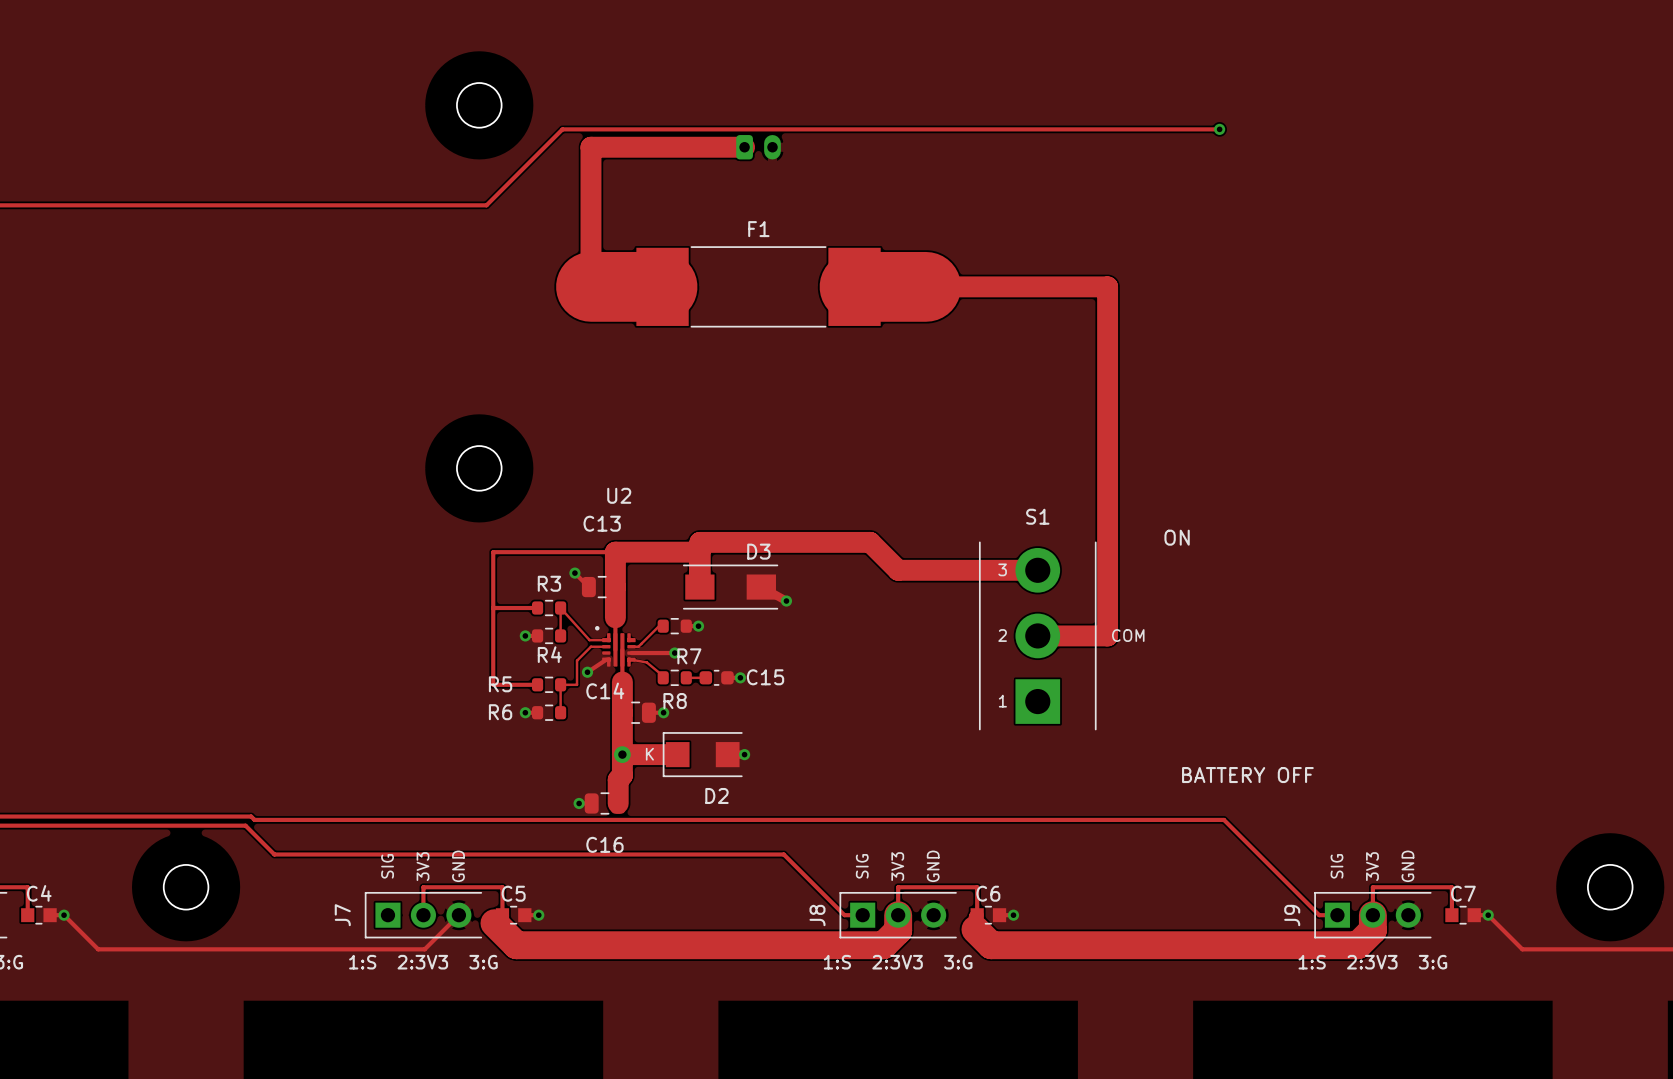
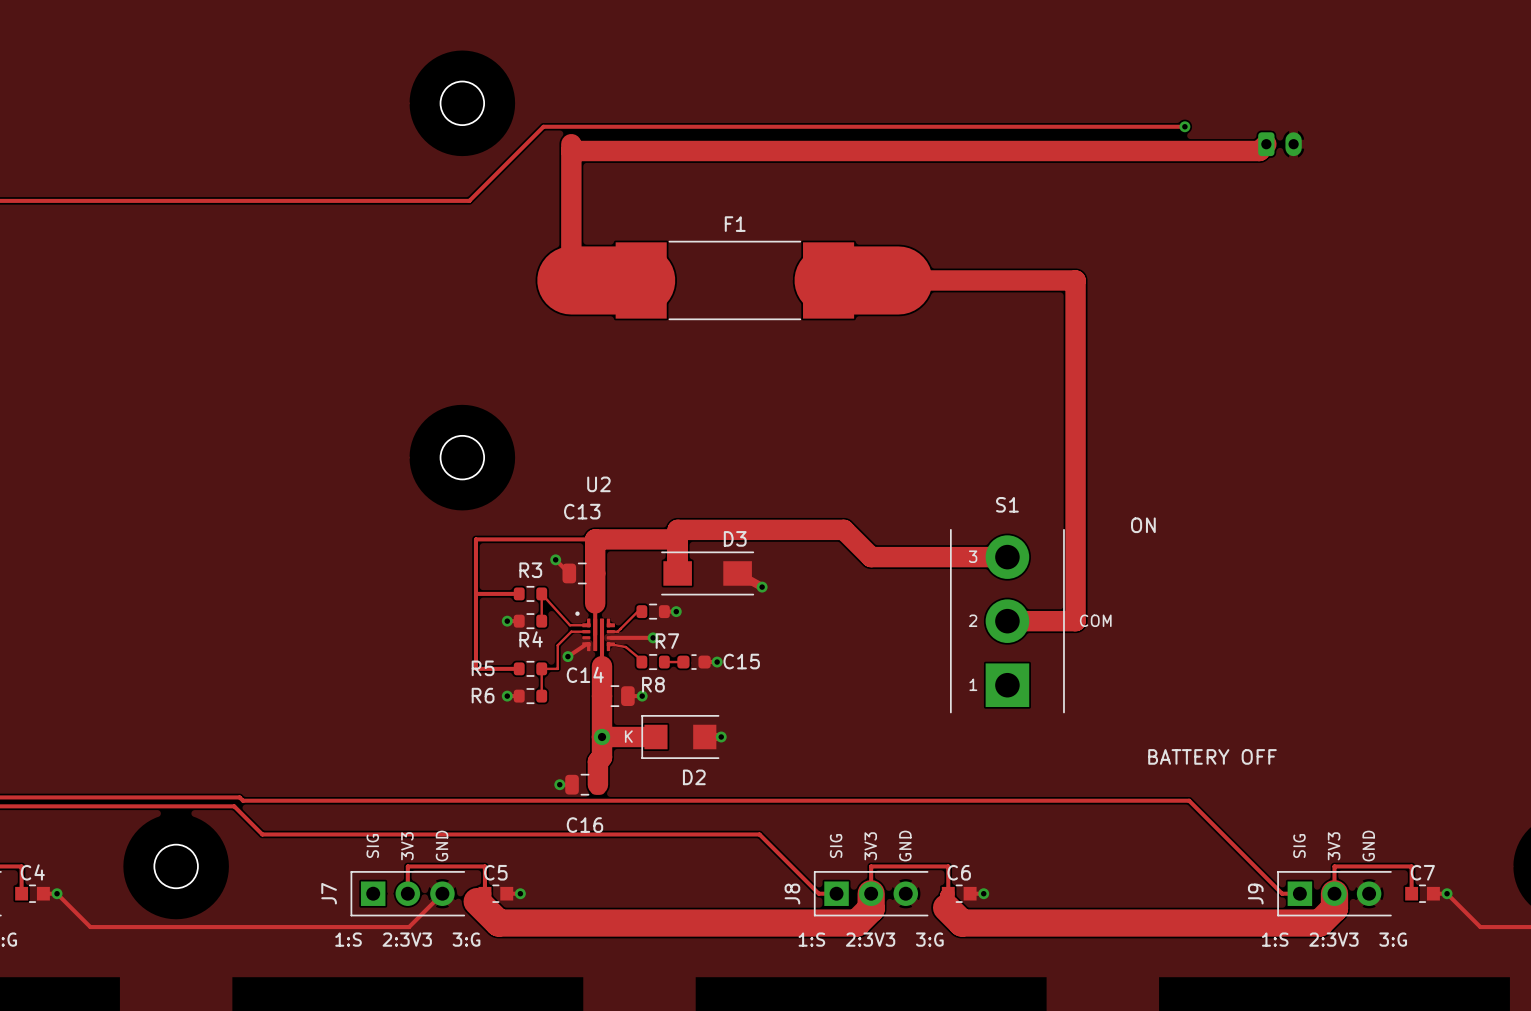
track: (590, 147) (744, 147) -> none
part: (758, 147) -> none
track: none -> (1266, 144) (1259, 151) (571, 151)
part: none -> (1279, 144)

